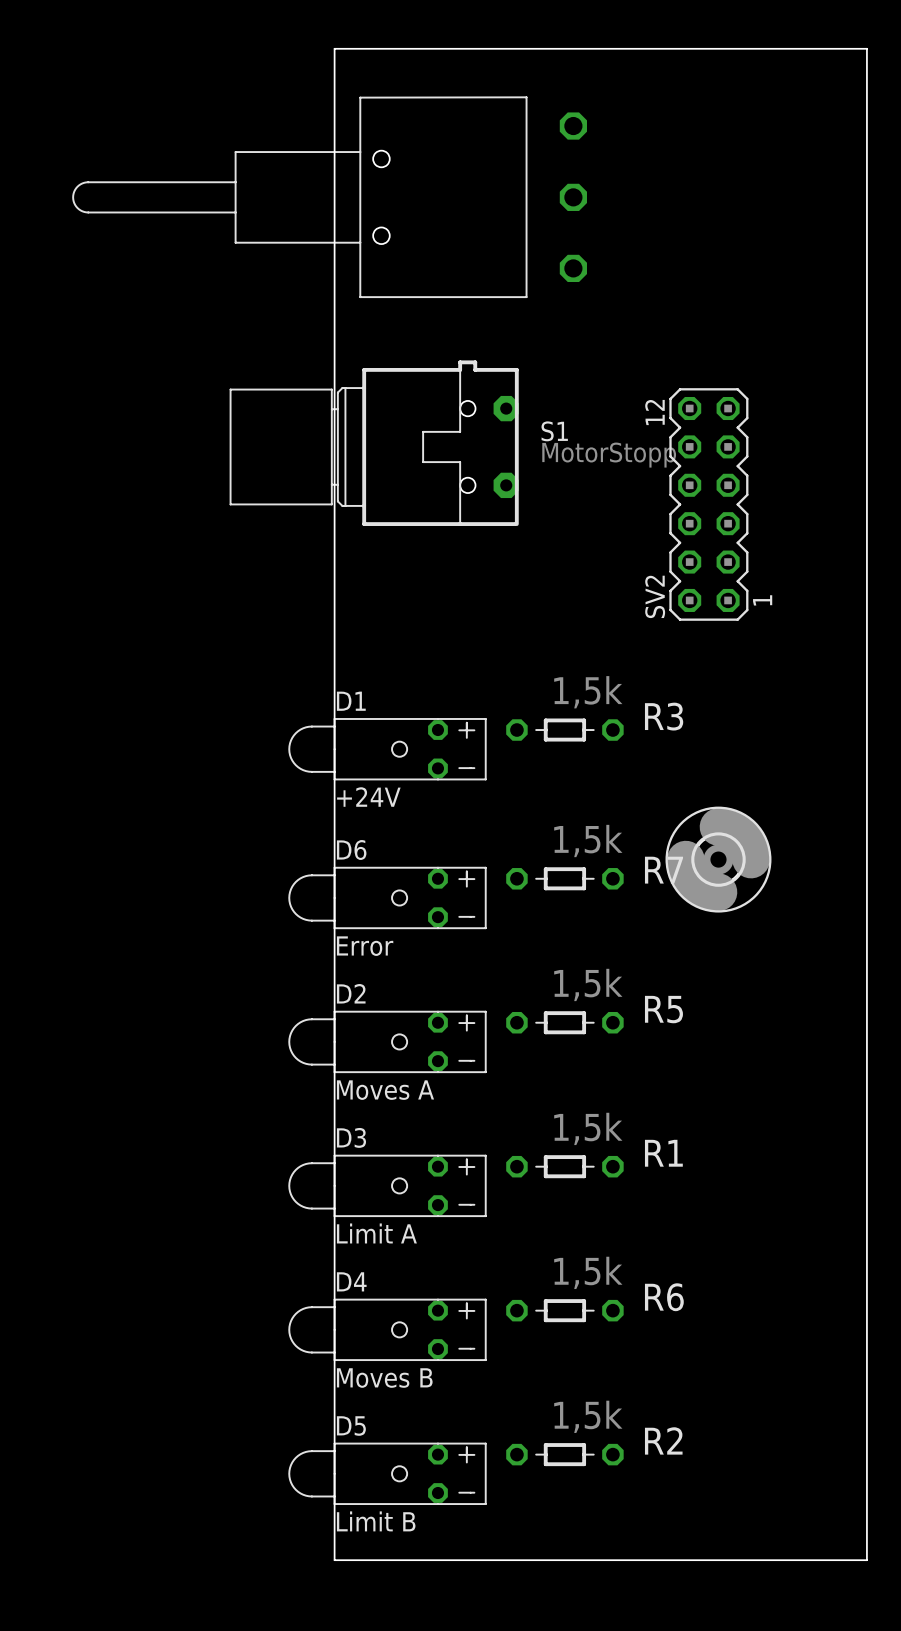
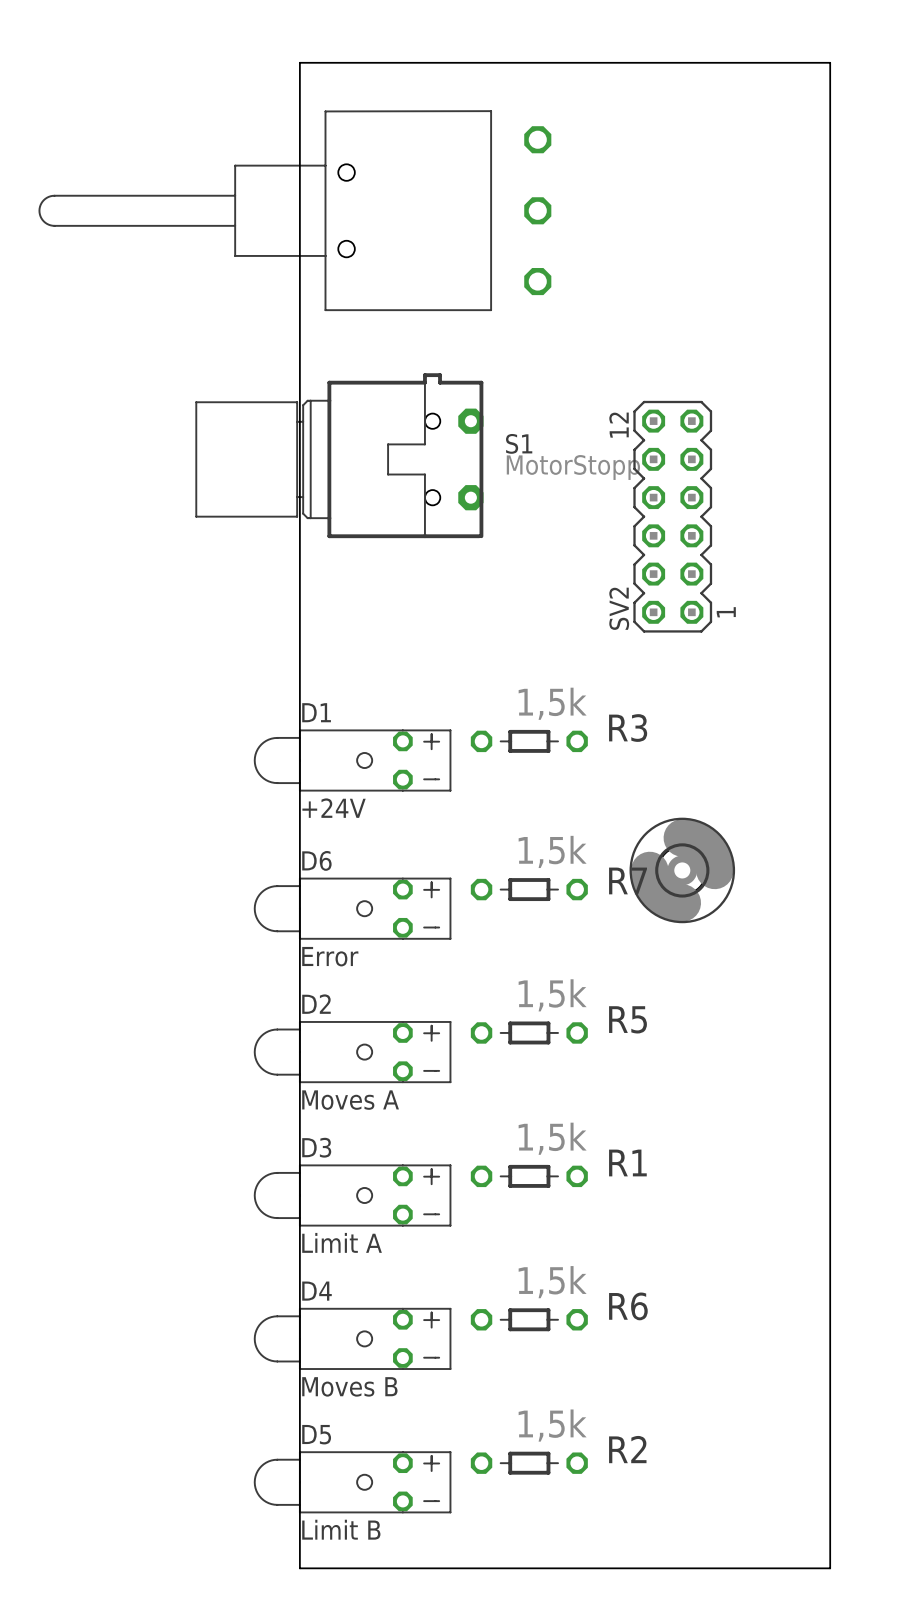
part footprint: [72, 96, 588, 299] -> [38, 110, 552, 312]

